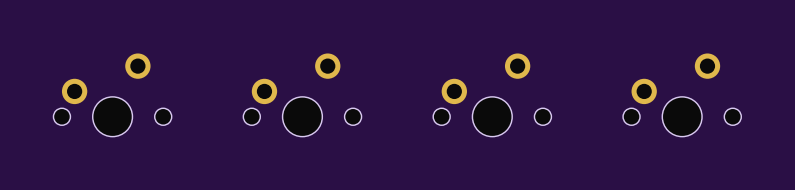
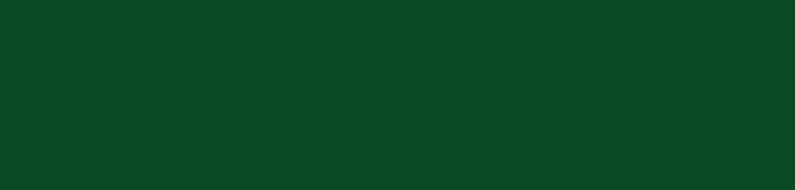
part: (112, 95) -> none
part: (302, 95) -> none
part: (492, 95) -> none
part: (682, 95) -> none

